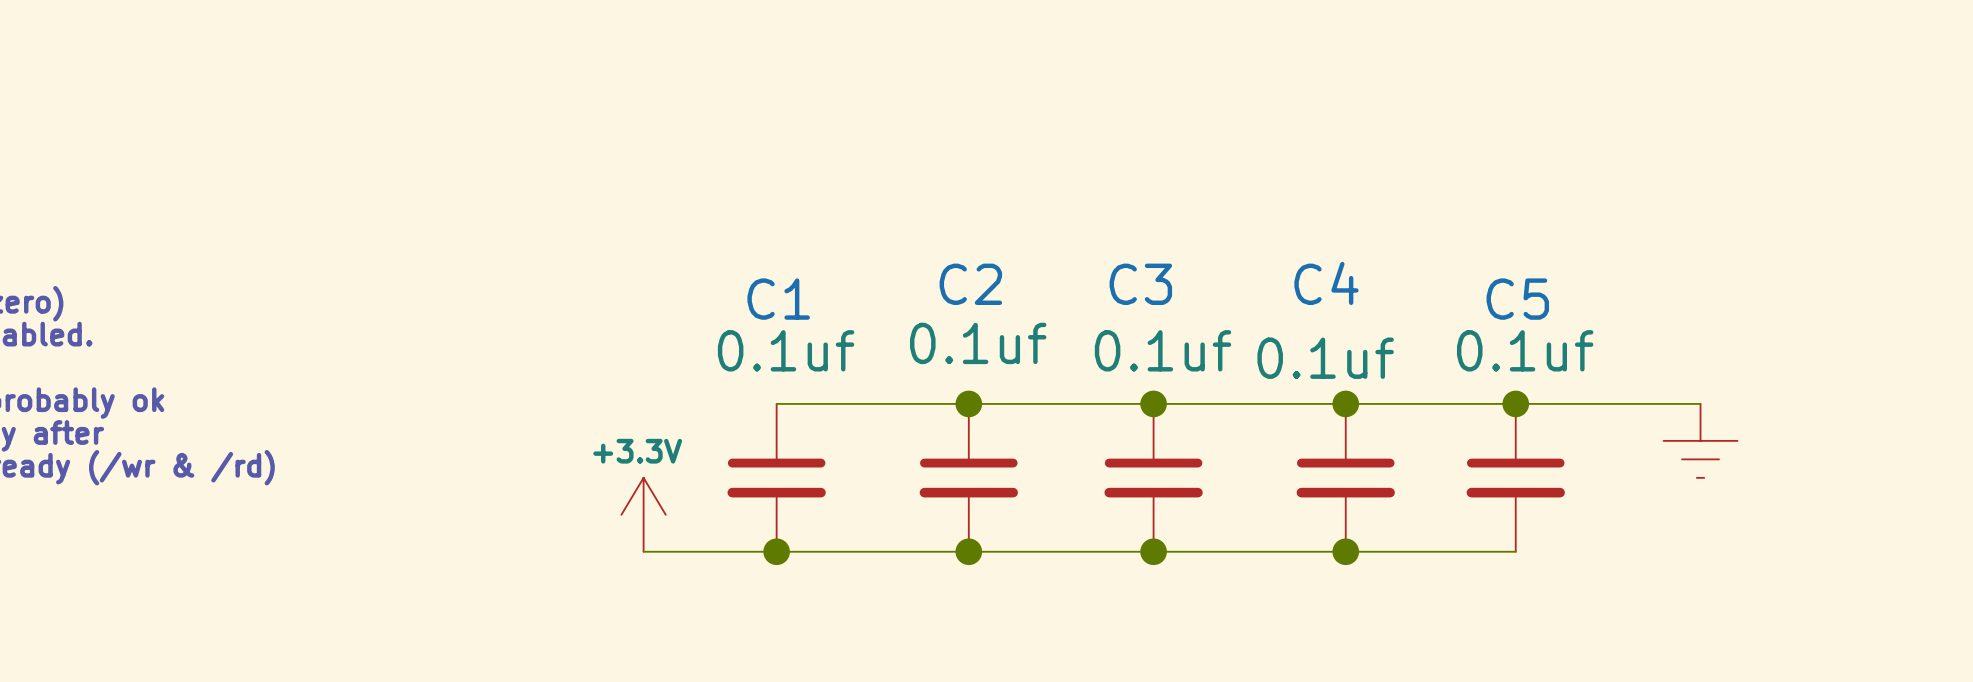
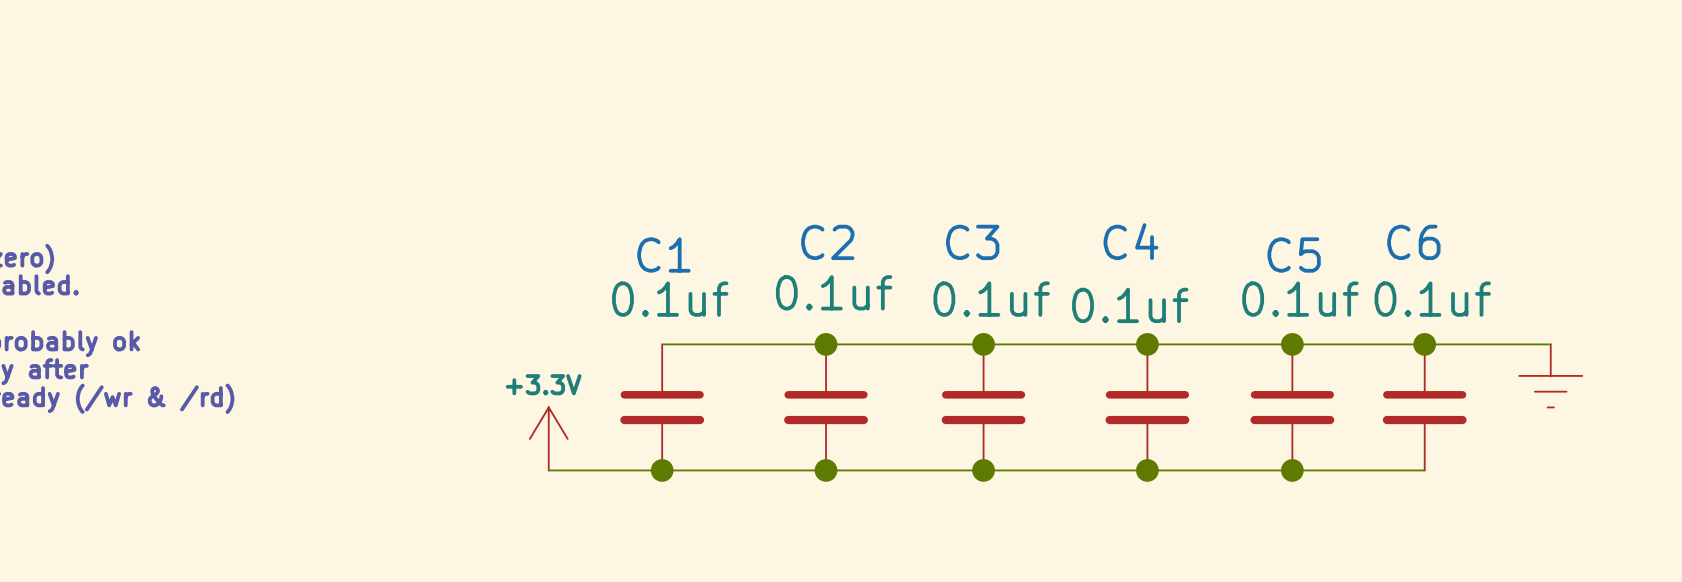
junction: none -> (1424, 344)
wire: none -> (1449, 344) (1550, 344)
power symbol position: (1700, 440) -> (1550, 375)
C6: none -> 0.1uf (1424, 407)
wire: none -> (1292, 470) (1424, 470)
junction: none -> (1292, 470)

